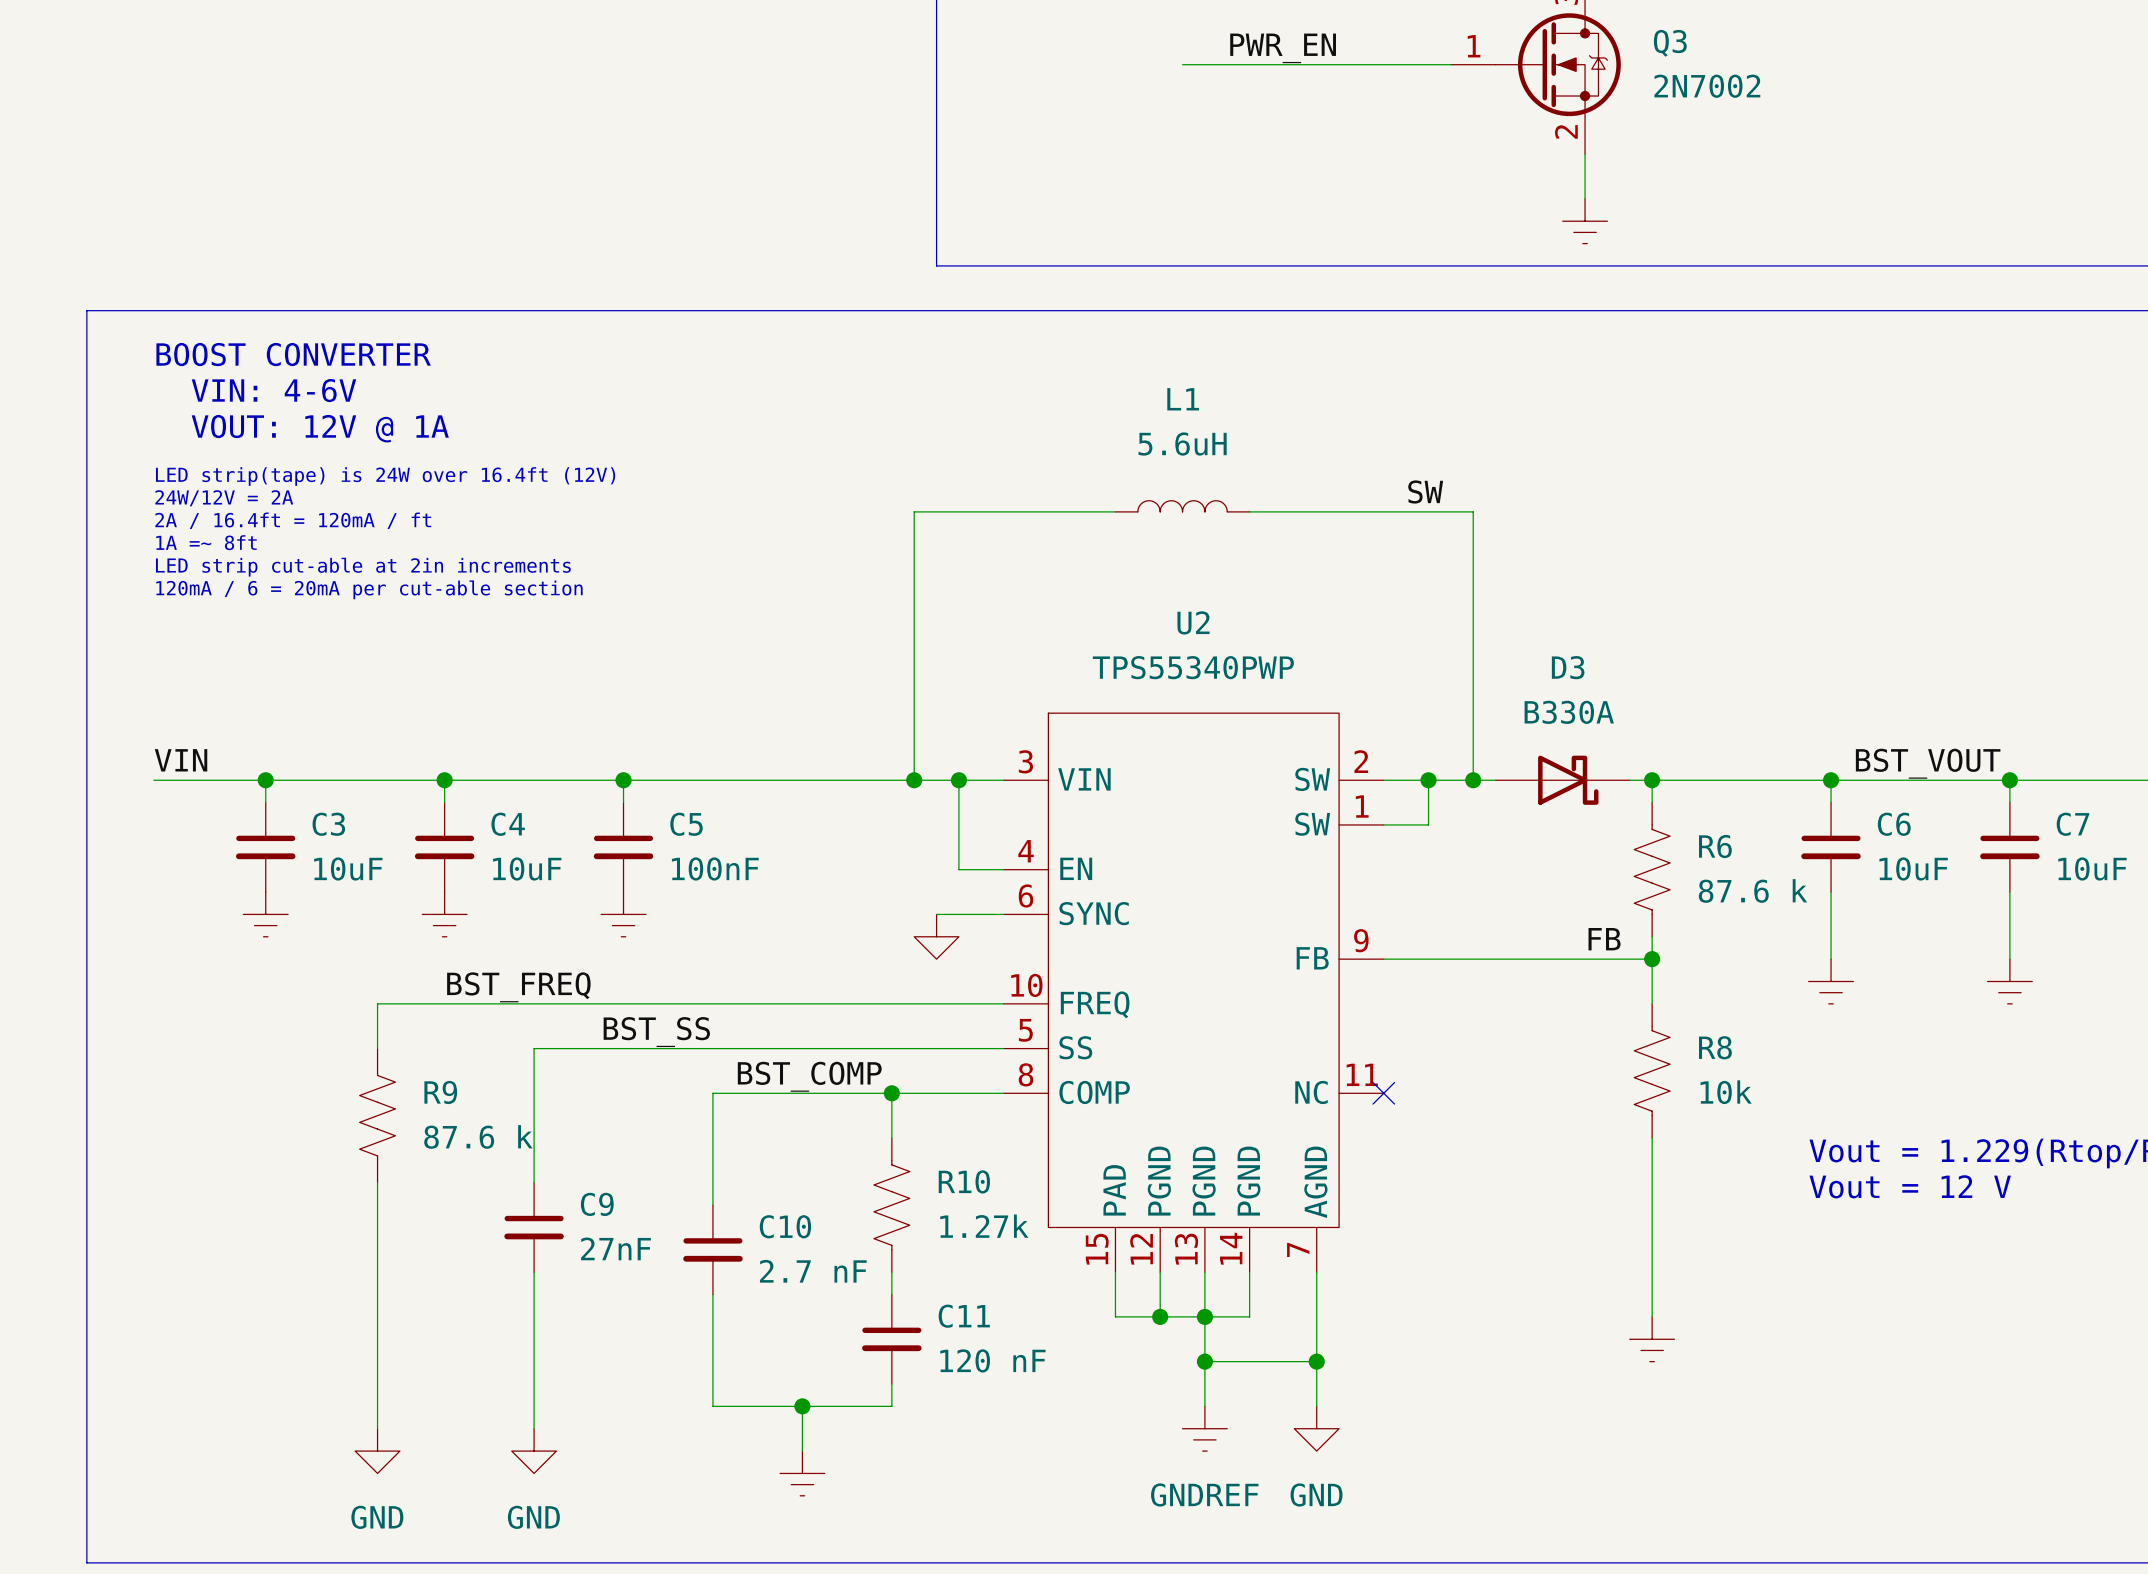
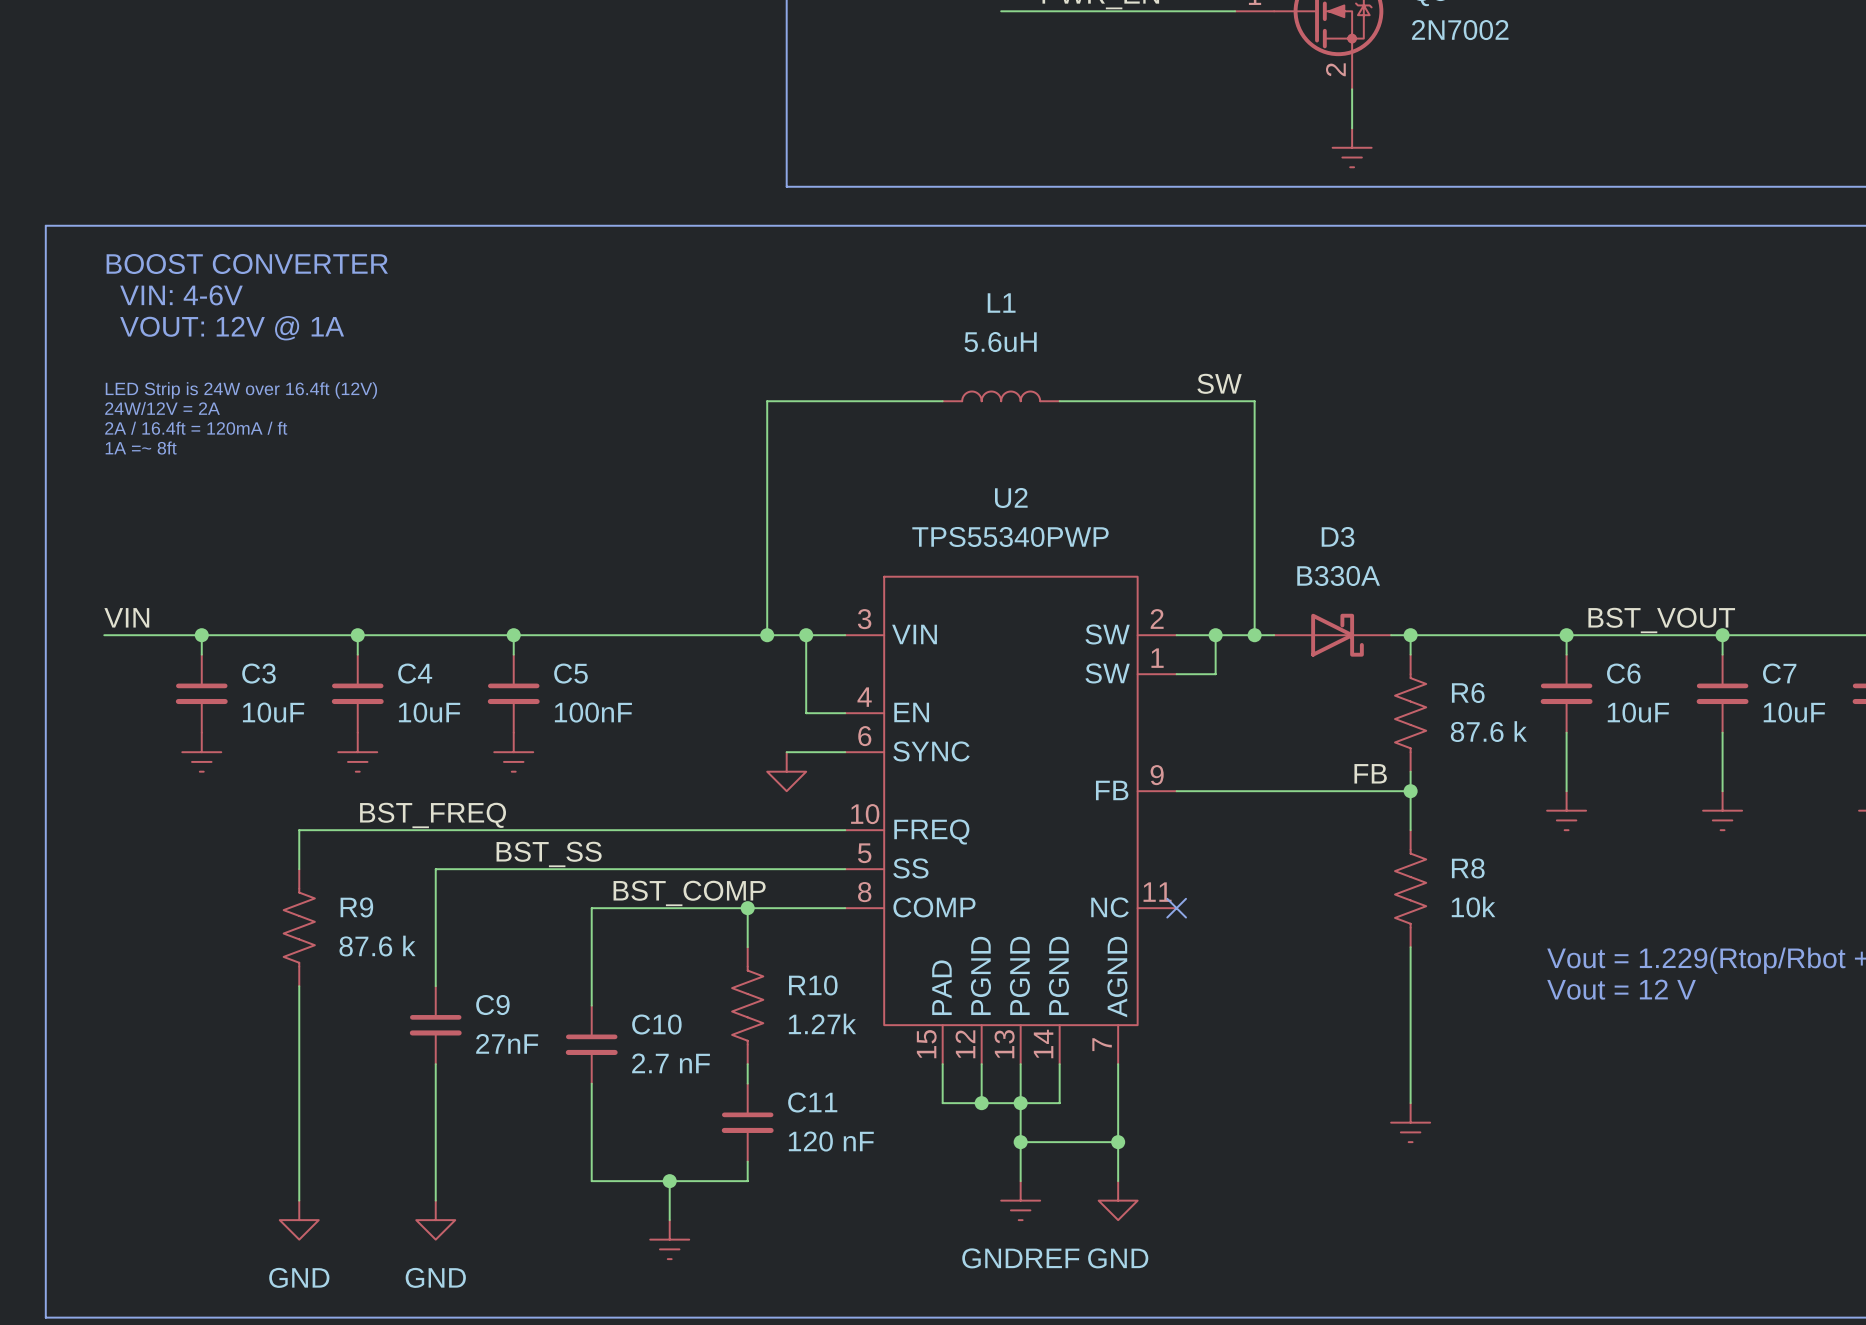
text: LED strip(tape) is 24W over 16.4ft (12V) (385, 476) -> none
text: 24W/12V = 2A (224, 498) -> LED Strip is 24W over 16.4ft (12V) (241, 390)
text: 2A / 16.4ft = 120mA / ft (293, 520) -> 24W/12V = 2A (162, 408)
text: 1A =~ 8ft (206, 542) -> 2A / 16.4ft = 120mA / ft (196, 428)
text: LED strip cut-able at 2in increments (363, 567) -> 1A =~ 8ft (141, 448)
text: 120mA / 6 = 20mA per cut-able section (369, 589) -> none

